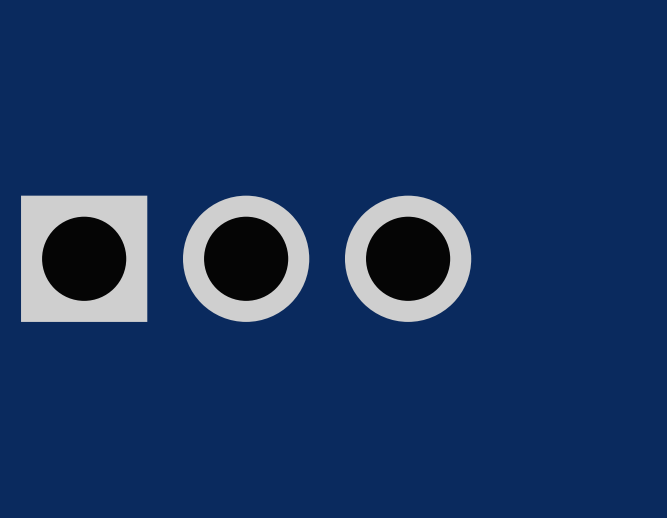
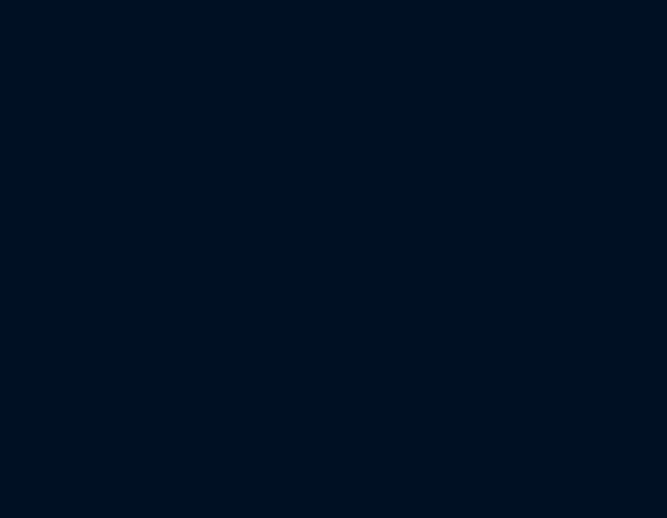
part: (246, 258) -> none

